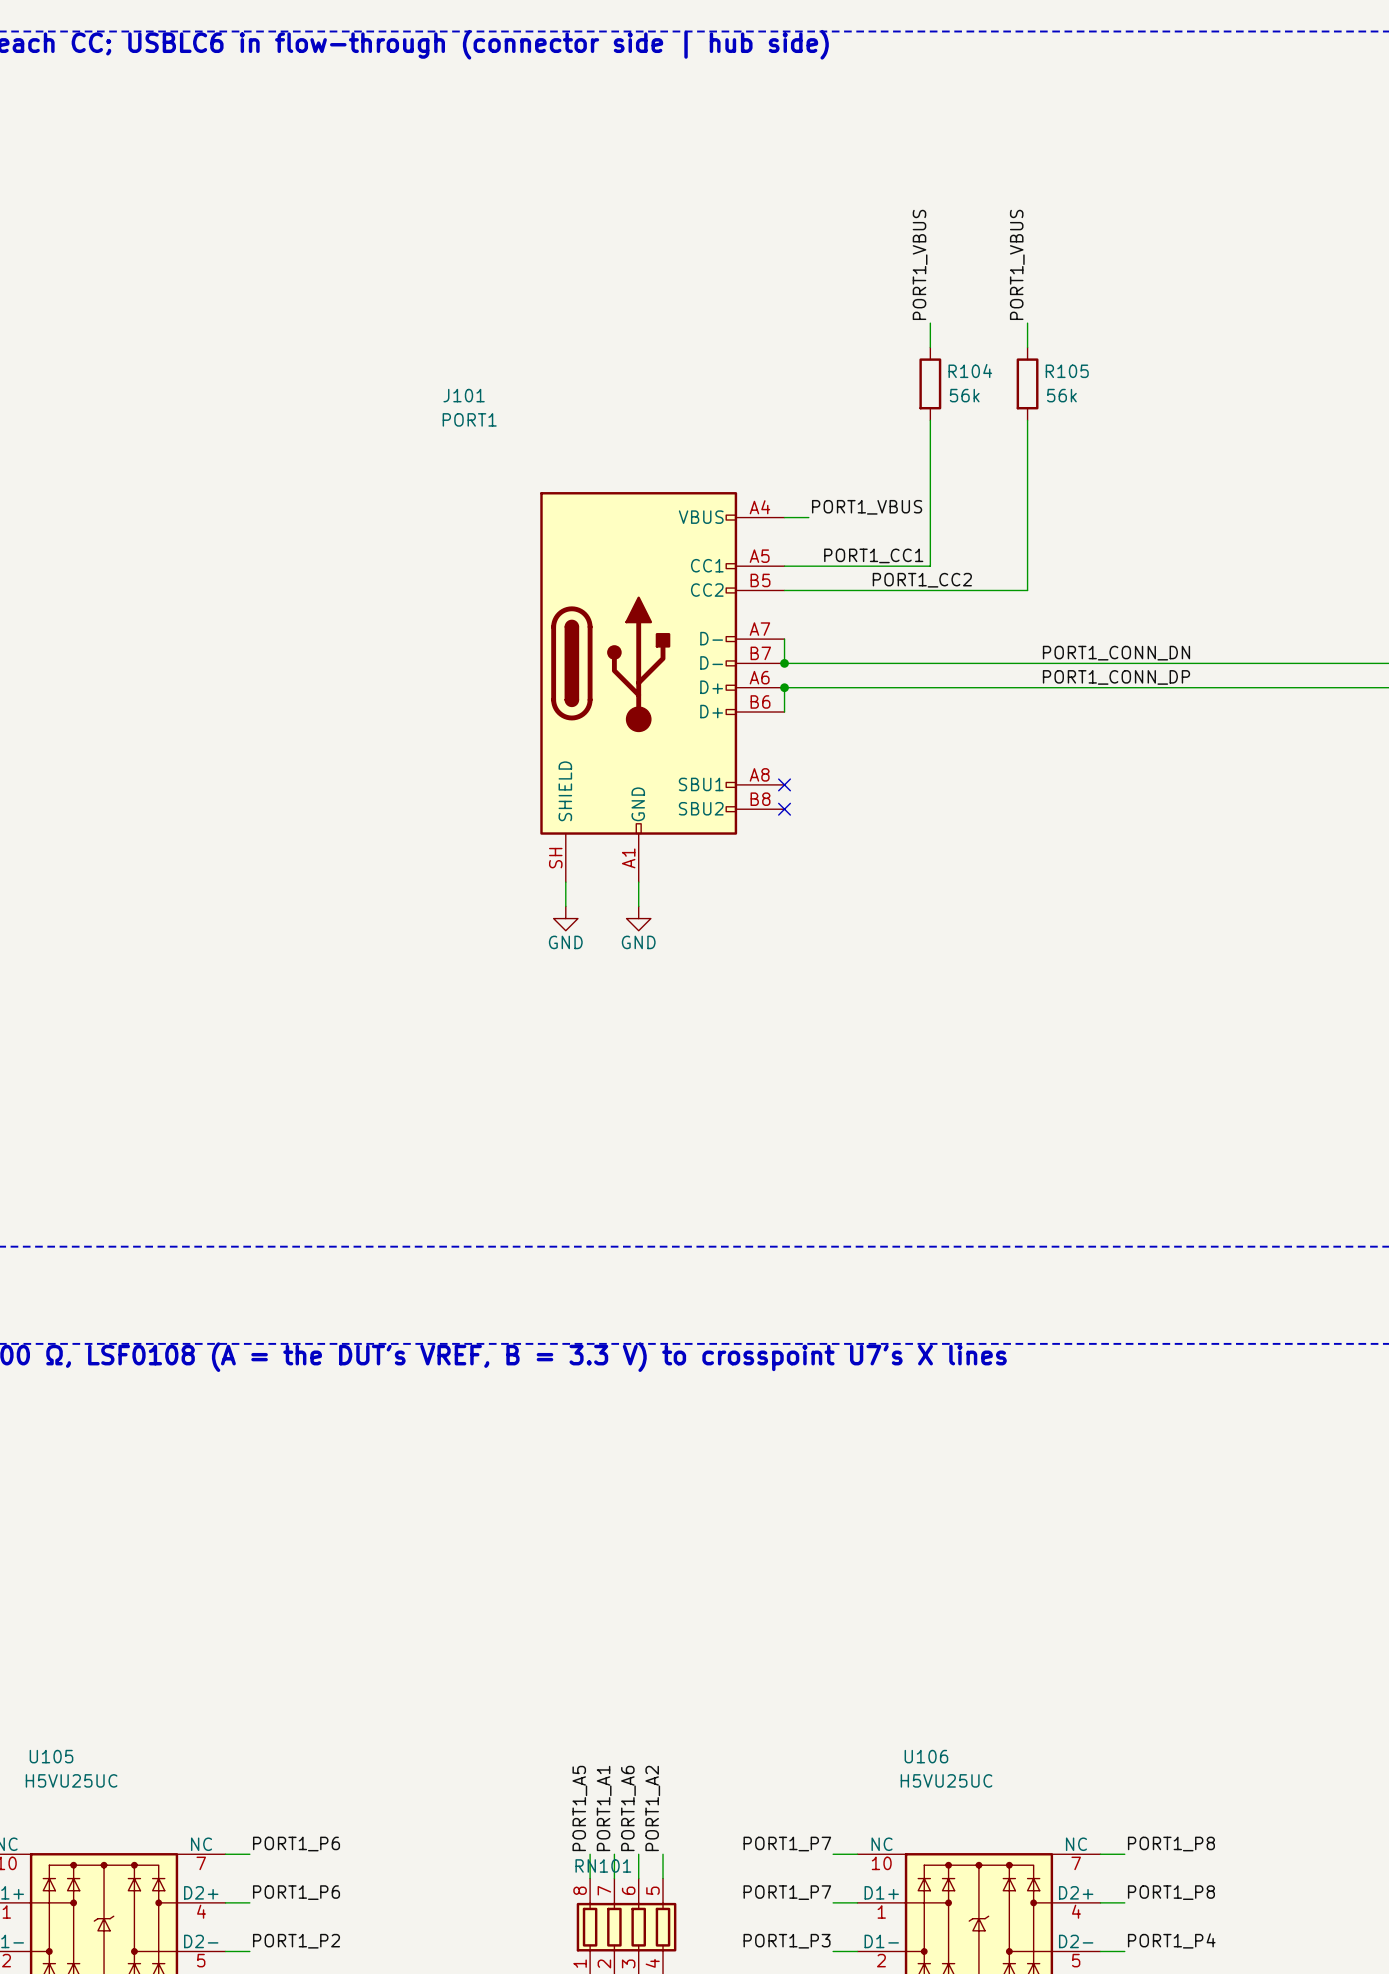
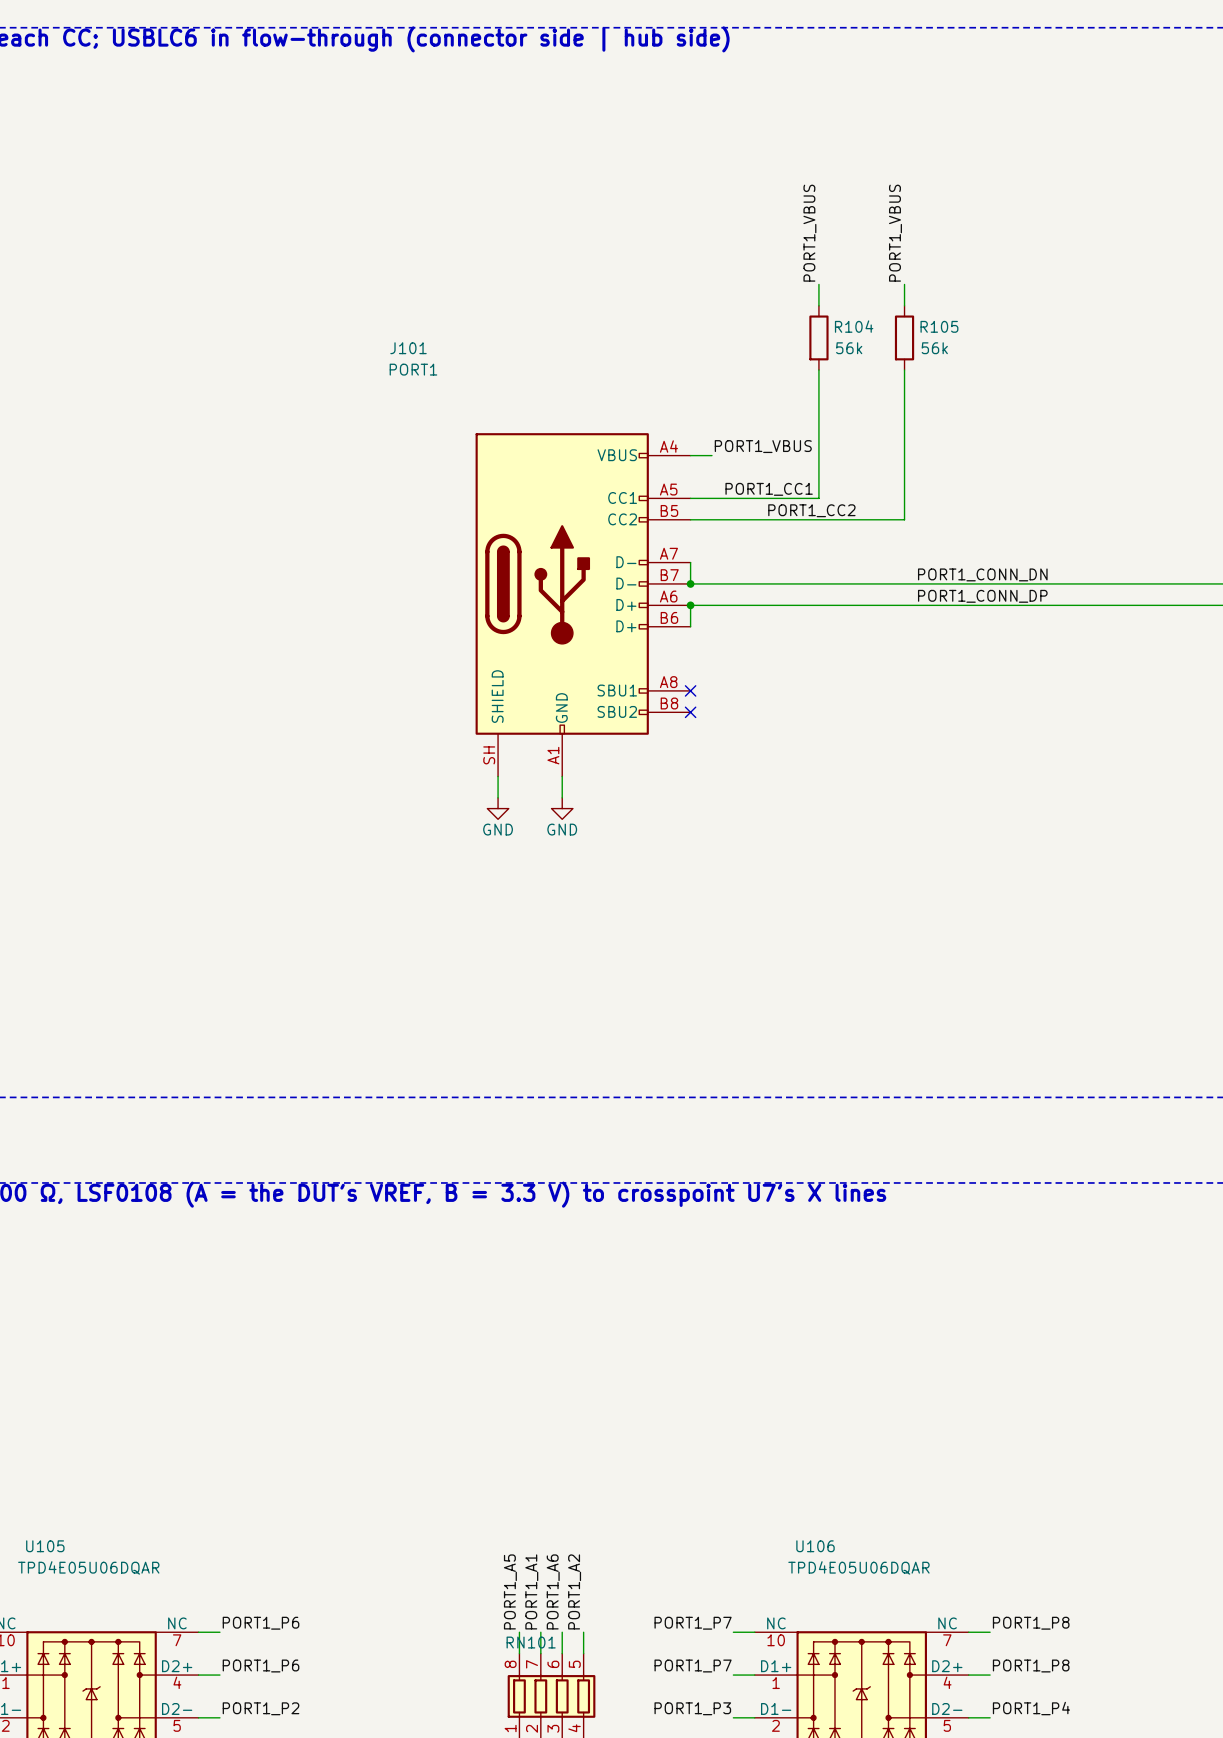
U105 value: H5VU25UC (71, 1780) -> TPD4E05U06DQAR (88, 1567)
U106 value: H5VU25UC (946, 1780) -> TPD4E05U06DQAR (858, 1567)

